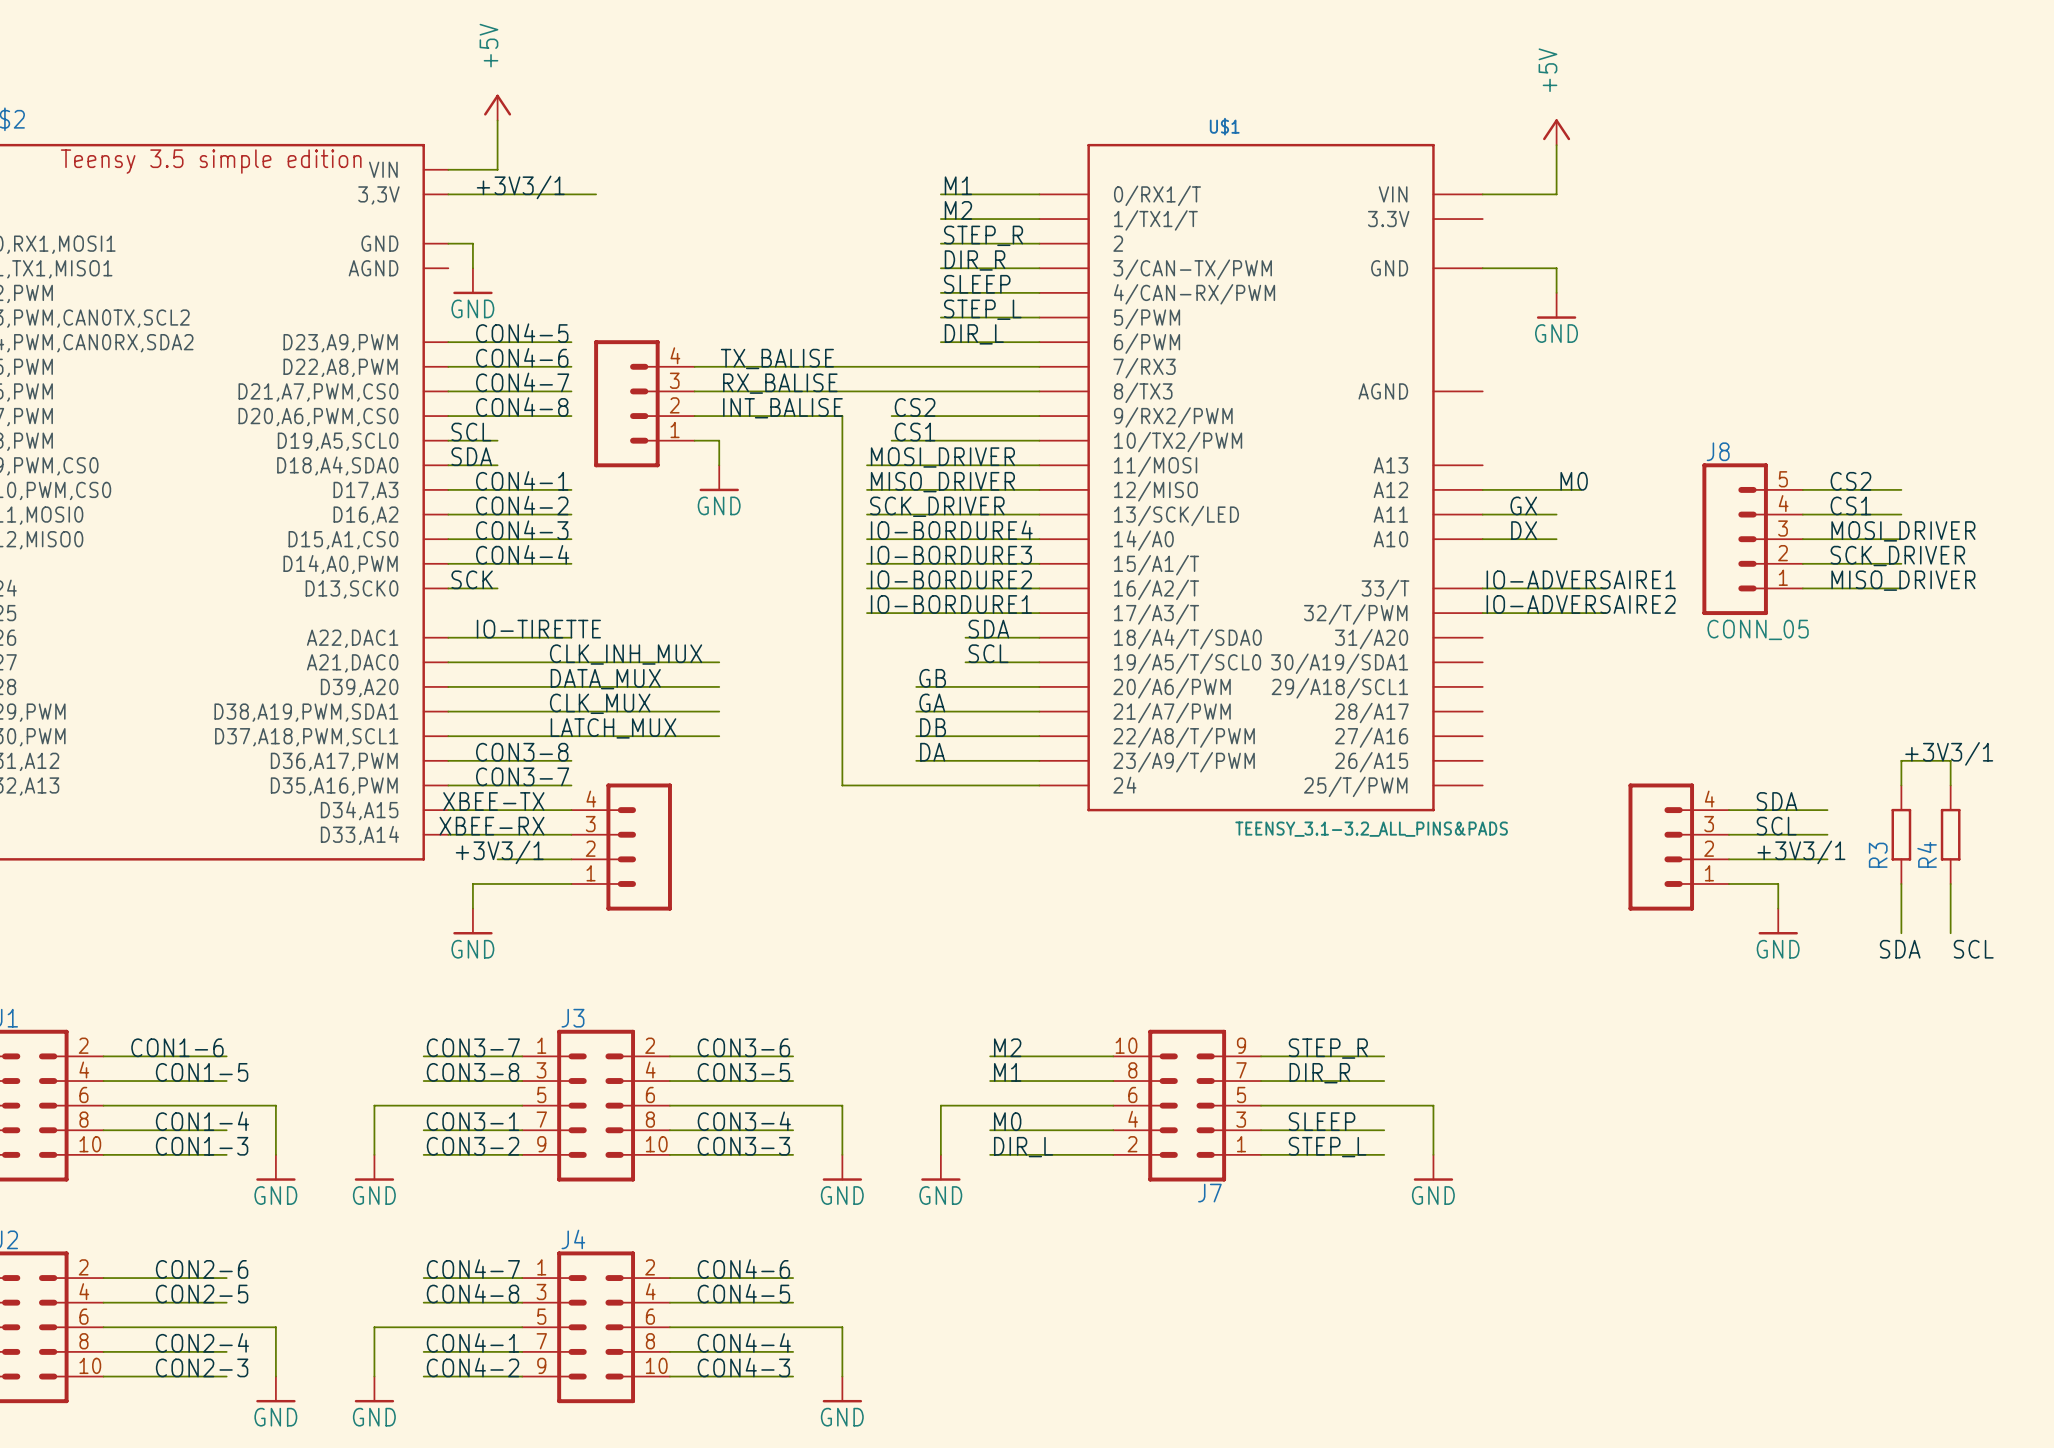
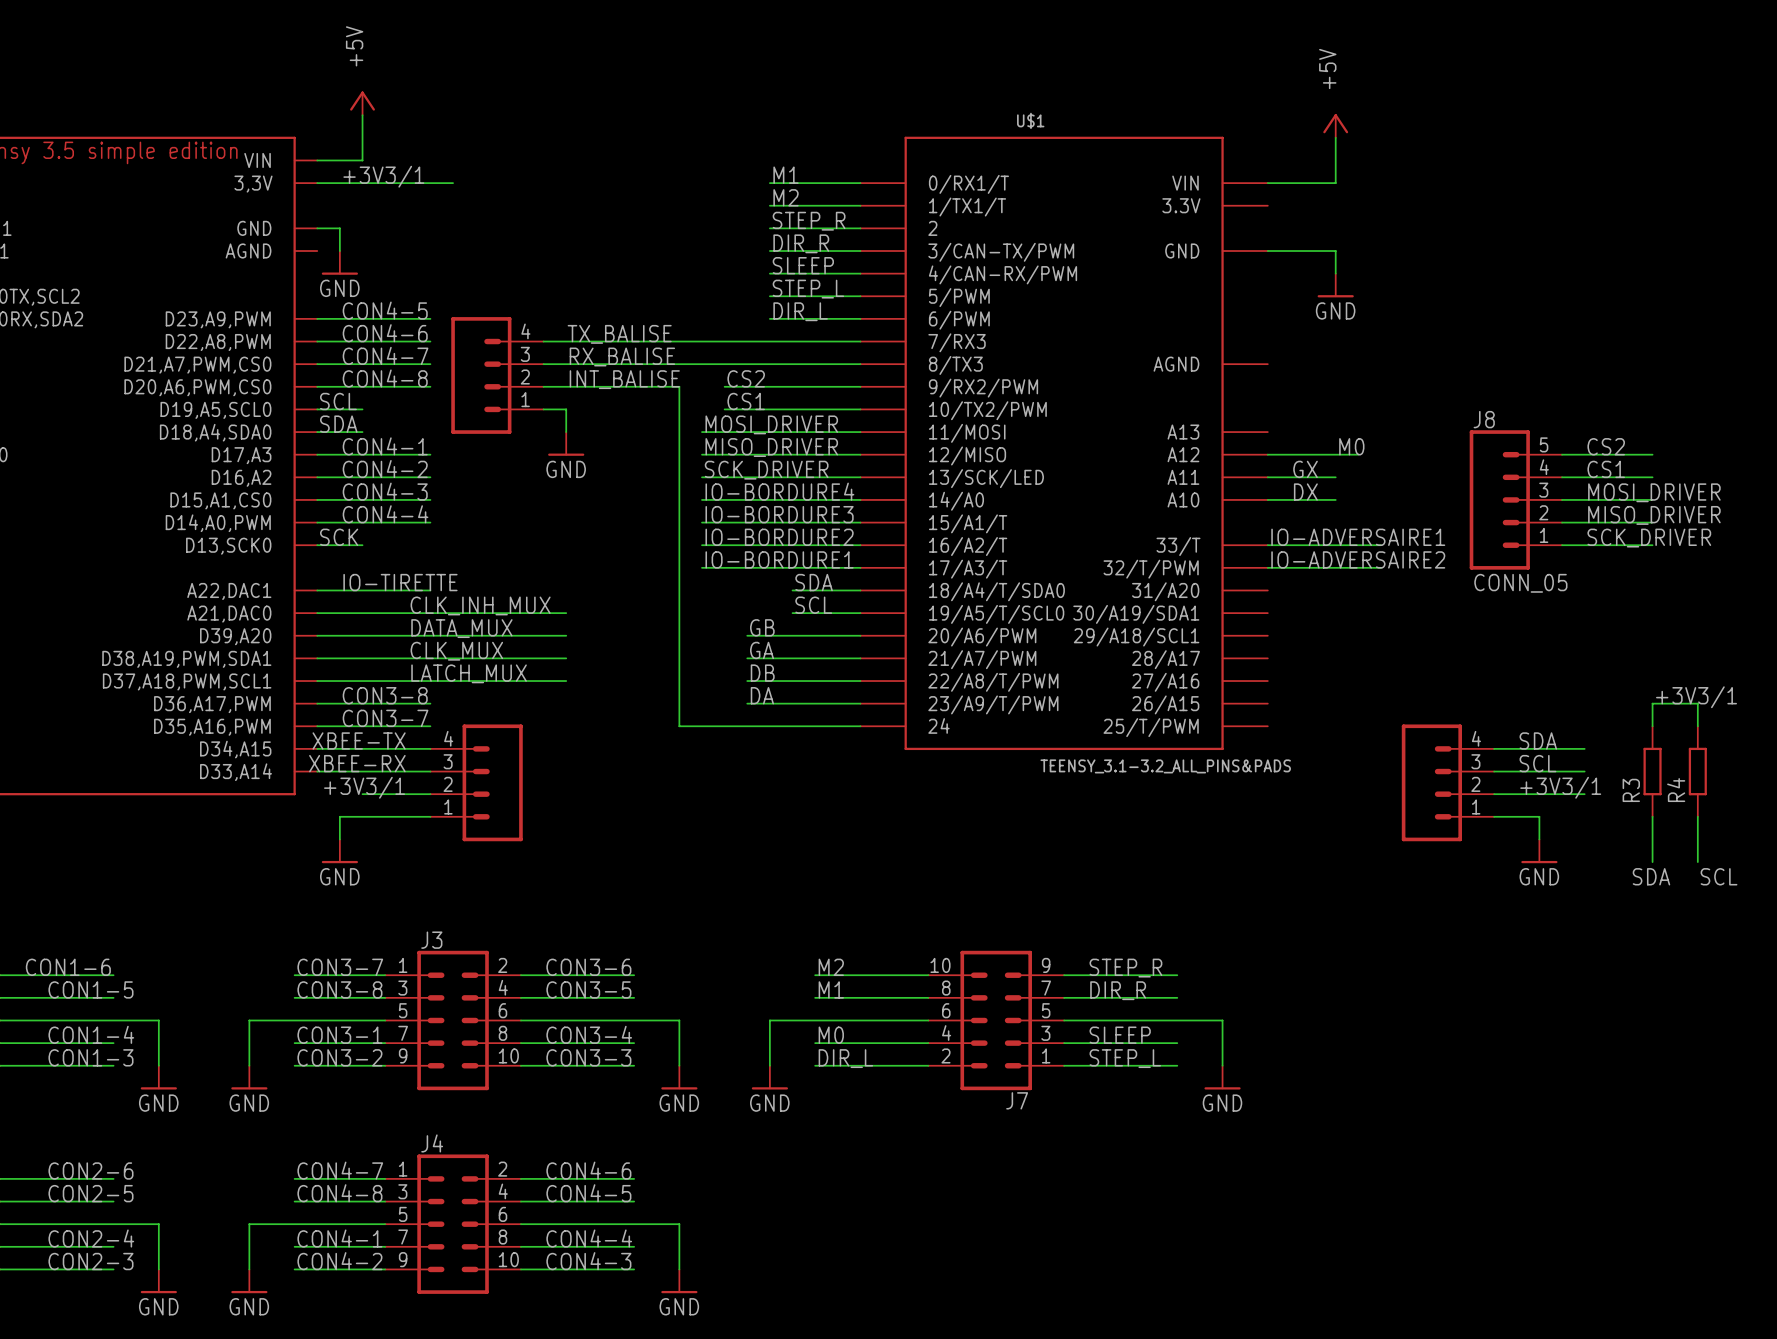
label: SCK_DRIVER (1897, 556) -> MISO_DRIVER (1654, 515)
label: MISO_DRIVER (1903, 580) -> SCK_DRIVER (1649, 538)

